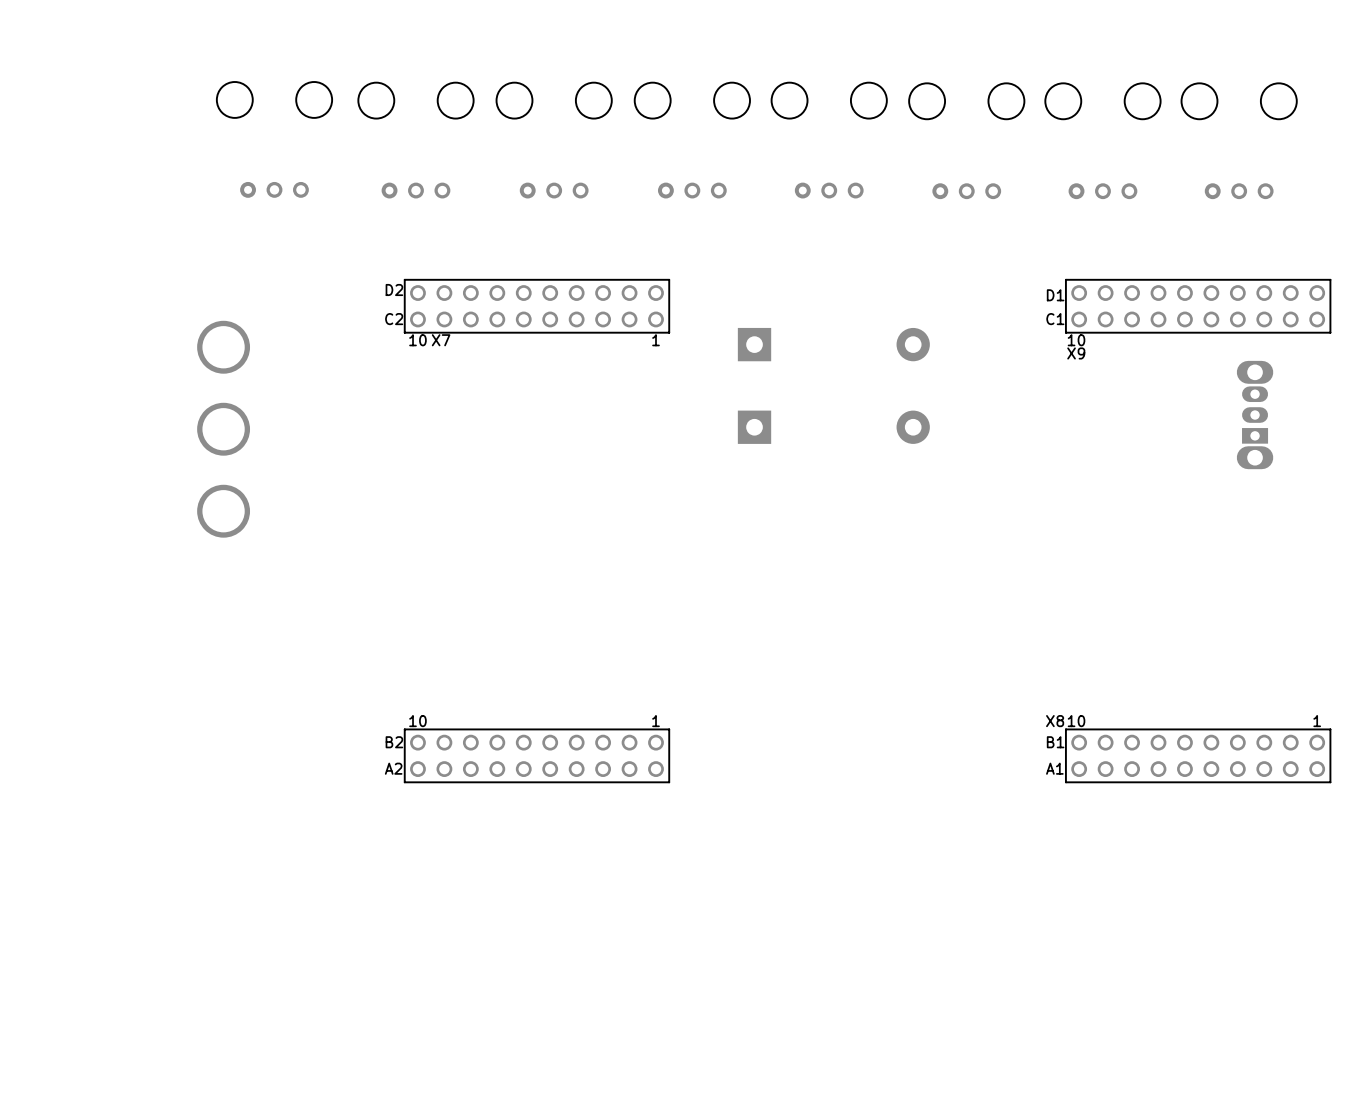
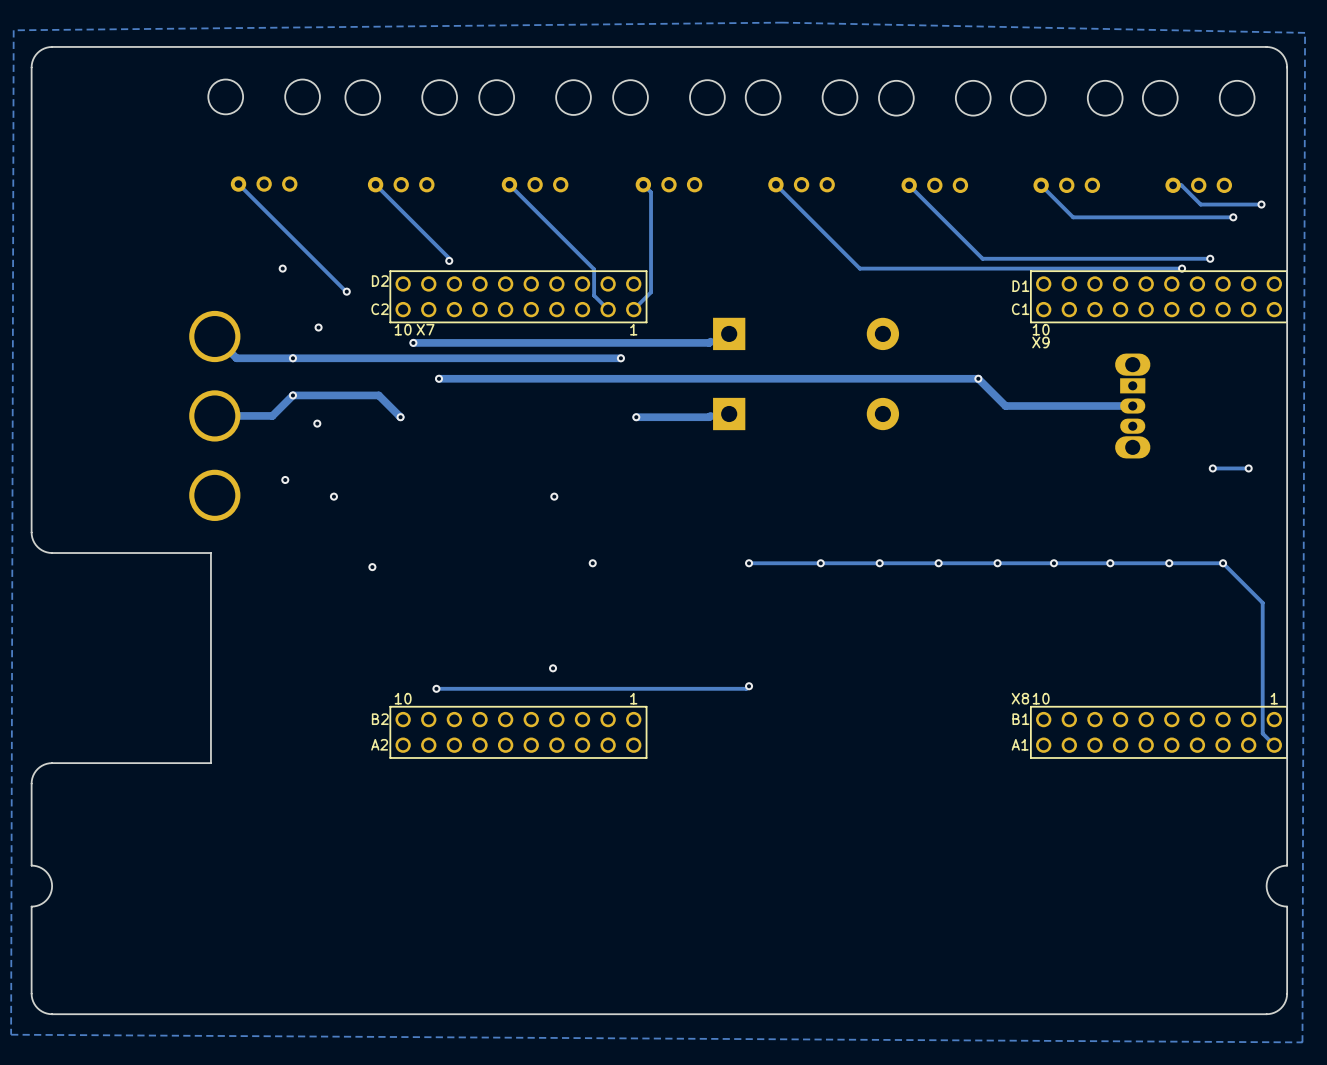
zone outline: none -> (782, 22) (1305, 32) (1302, 1042) (11, 1034) (13, 30) (782, 22)
board edge: none -> (1266, 46) (52, 46) (39, 51) (34, 57) (31, 67) (32, 537) (39, 548) (49, 552) (210, 553) (210, 763) (52, 763) (41, 765) (35, 771) (31, 783) (31, 865) (39, 867) (46, 871) (50, 878) (52, 886) (50, 893) (46, 900) (39, 905) (31, 906) (31, 993) (35, 1006) (41, 1011) (52, 1014) (1266, 1014) (1279, 1009) (1284, 1003) (1286, 996) (1287, 906) (1279, 905) (1272, 900) (1268, 893) (1266, 886) (1268, 878) (1272, 871) (1279, 867) (1287, 865) (1287, 67) (1285, 59) (1281, 52) (1274, 48) (1266, 46)
track: none -> (238, 184) (346, 291)
track: none -> (375, 184) (449, 258) (449, 260)
track: none -> (509, 184) (594, 269) (594, 295) (608, 309)
track: none -> (643, 184) (651, 192) (651, 292) (633, 309)
track: none -> (775, 184) (859, 268) (1182, 268)
track: none -> (909, 185) (982, 258) (1210, 258)
track: none -> (1041, 185) (1073, 217) (1233, 217)
track: none -> (1173, 185) (1181, 185) (1200, 204) (1261, 204)
via: none -> (1261, 204)
via: none -> (1233, 217)
via: none -> (1210, 258)
via: none -> (449, 260)
via: none -> (282, 268)
via: none -> (1182, 268)
via: none -> (346, 291)
via: none -> (318, 327)
track: none -> (214, 336) (236, 358) (620, 358)
track: none -> (710, 341) (413, 342)
via: none -> (413, 342)
via: none -> (292, 358)
via: none -> (620, 358)
track: none -> (439, 378) (978, 378) (1005, 406) (1132, 406)
via: none -> (439, 378)
via: none -> (978, 378)
via: none -> (292, 395)
part rotation: 0° (1255, 415) -> 180° (1132, 406)
part position: (1255, 415) -> (1132, 406)
track: none -> (214, 415) (272, 415) (292, 395) (378, 395) (400, 417)
track: none -> (710, 415) (636, 417)
via: none -> (400, 417)
via: none -> (636, 417)
via: none -> (317, 423)
via: none -> (1212, 468)
track: none -> (1248, 468) (1212, 468)
via: none -> (1248, 468)
via: none -> (285, 479)
via: none -> (333, 496)
via: none -> (554, 496)
via: none -> (592, 563)
track: none -> (749, 563) (1223, 563) (1262, 602) (1262, 733) (1274, 745)
via: none -> (749, 563)
via: none -> (820, 563)
via: none -> (879, 563)
via: none -> (938, 563)
via: none -> (997, 563)
via: none -> (1053, 563)
via: none -> (1110, 563)
via: none -> (1169, 563)
via: none -> (1223, 563)
via: none -> (372, 567)
via: none -> (553, 668)
track: none -> (749, 686) (746, 688) (436, 688)
via: none -> (749, 686)
via: none -> (436, 688)

